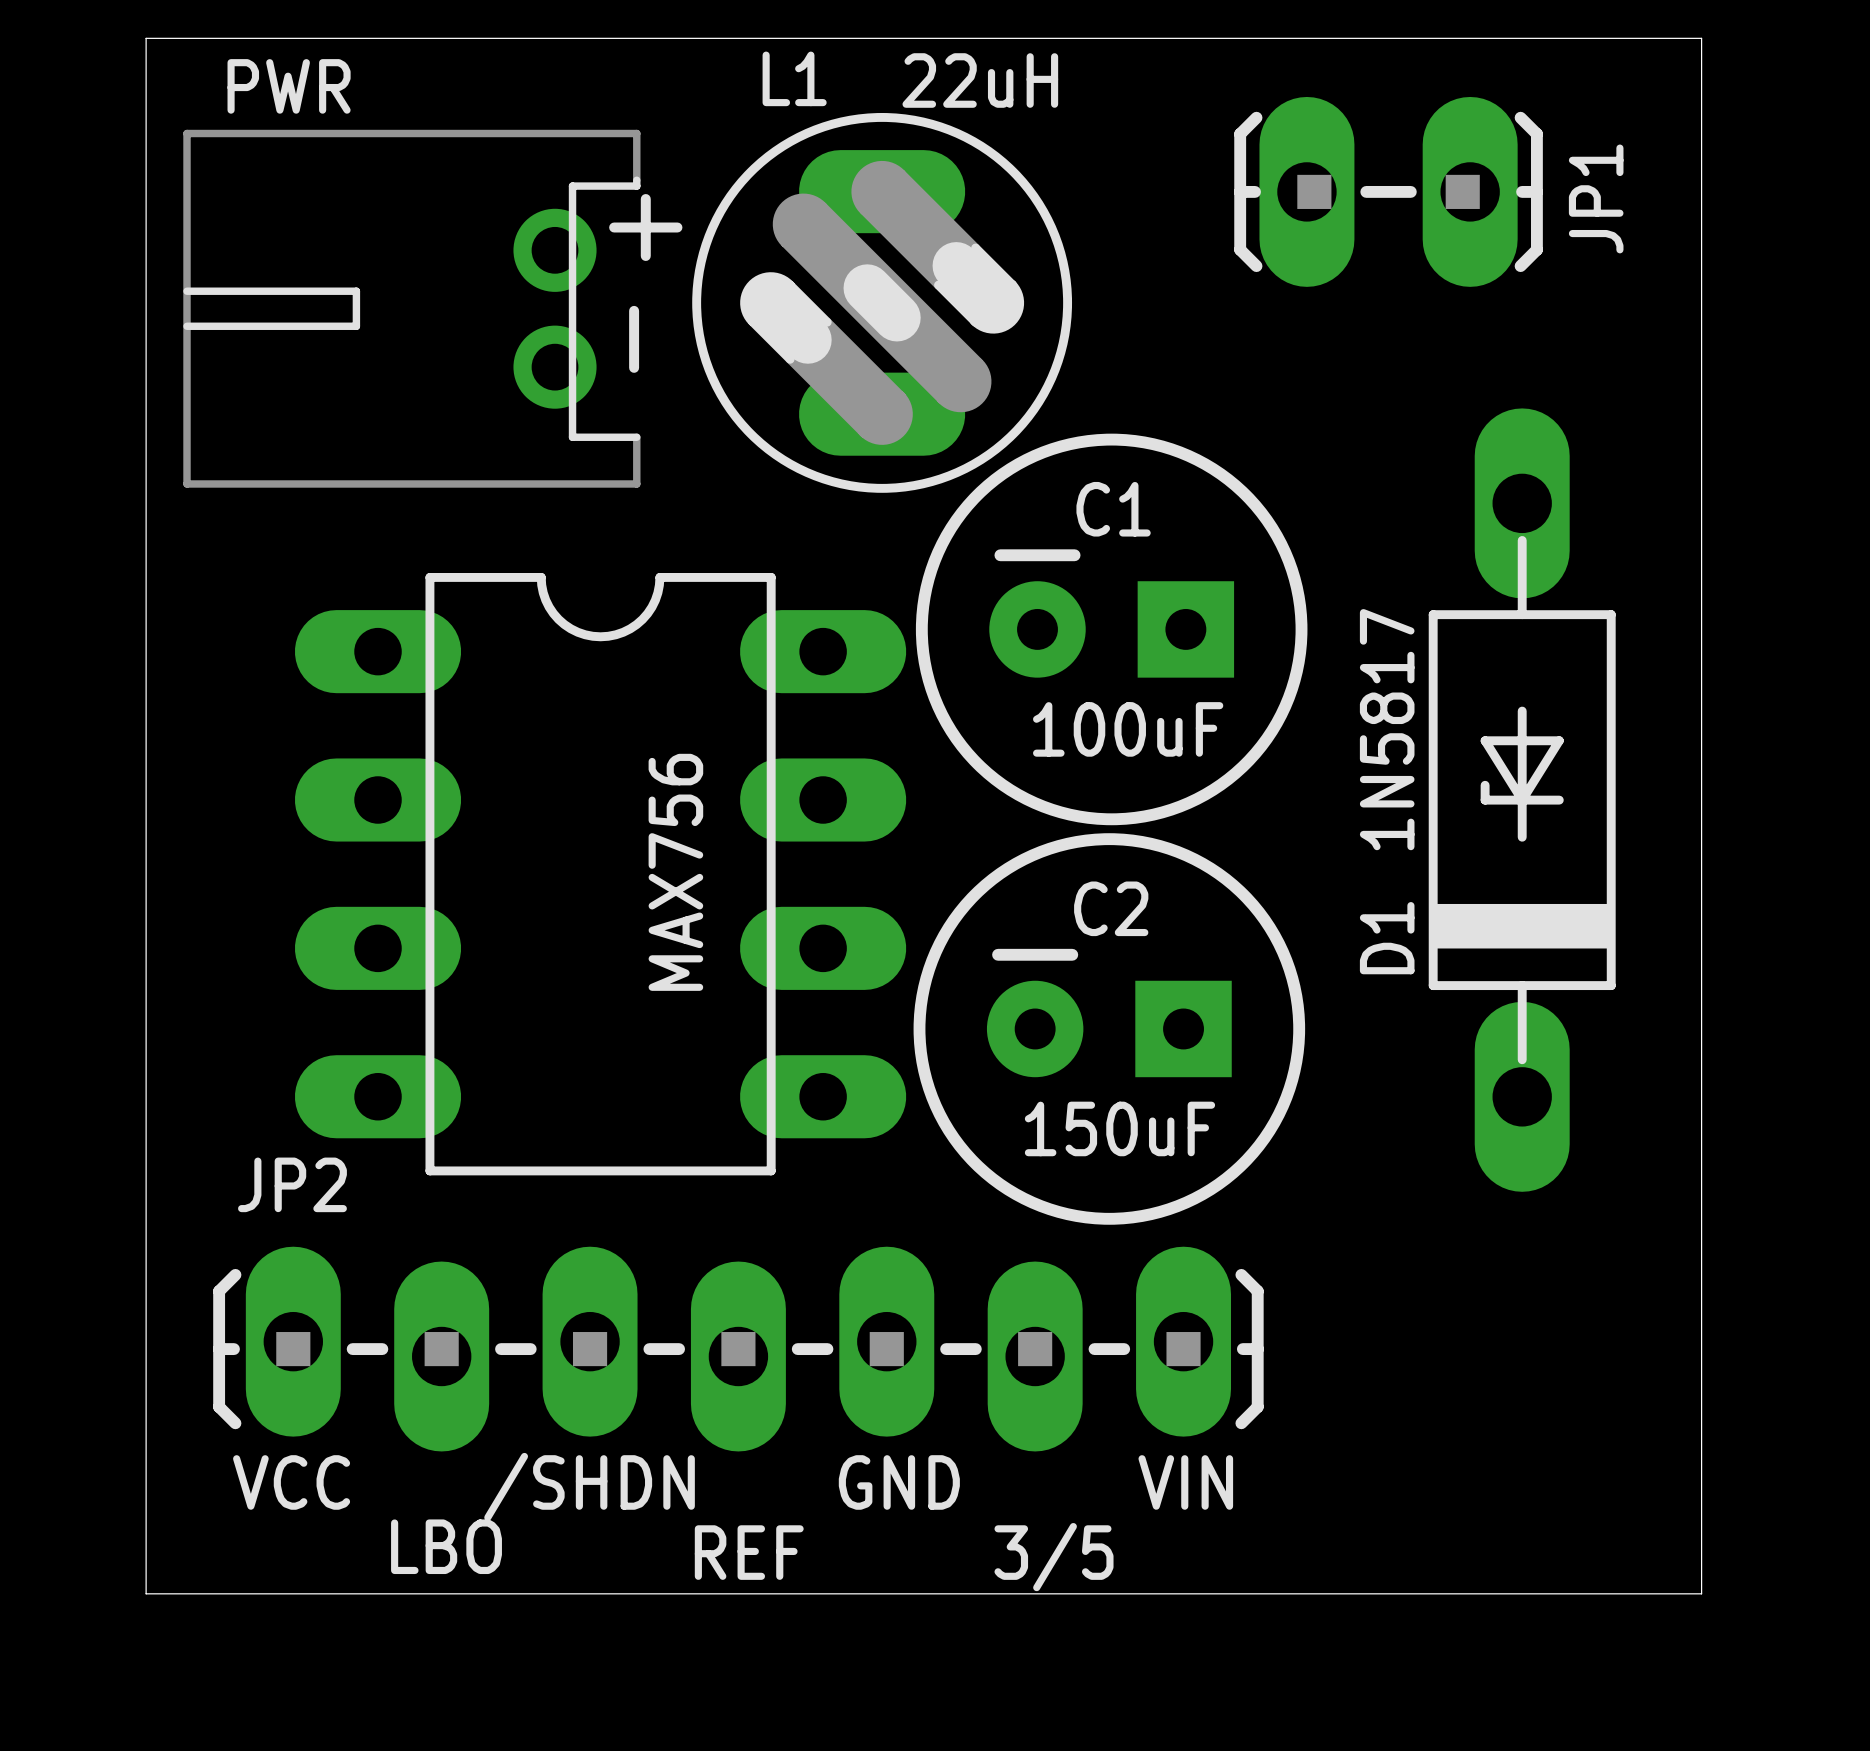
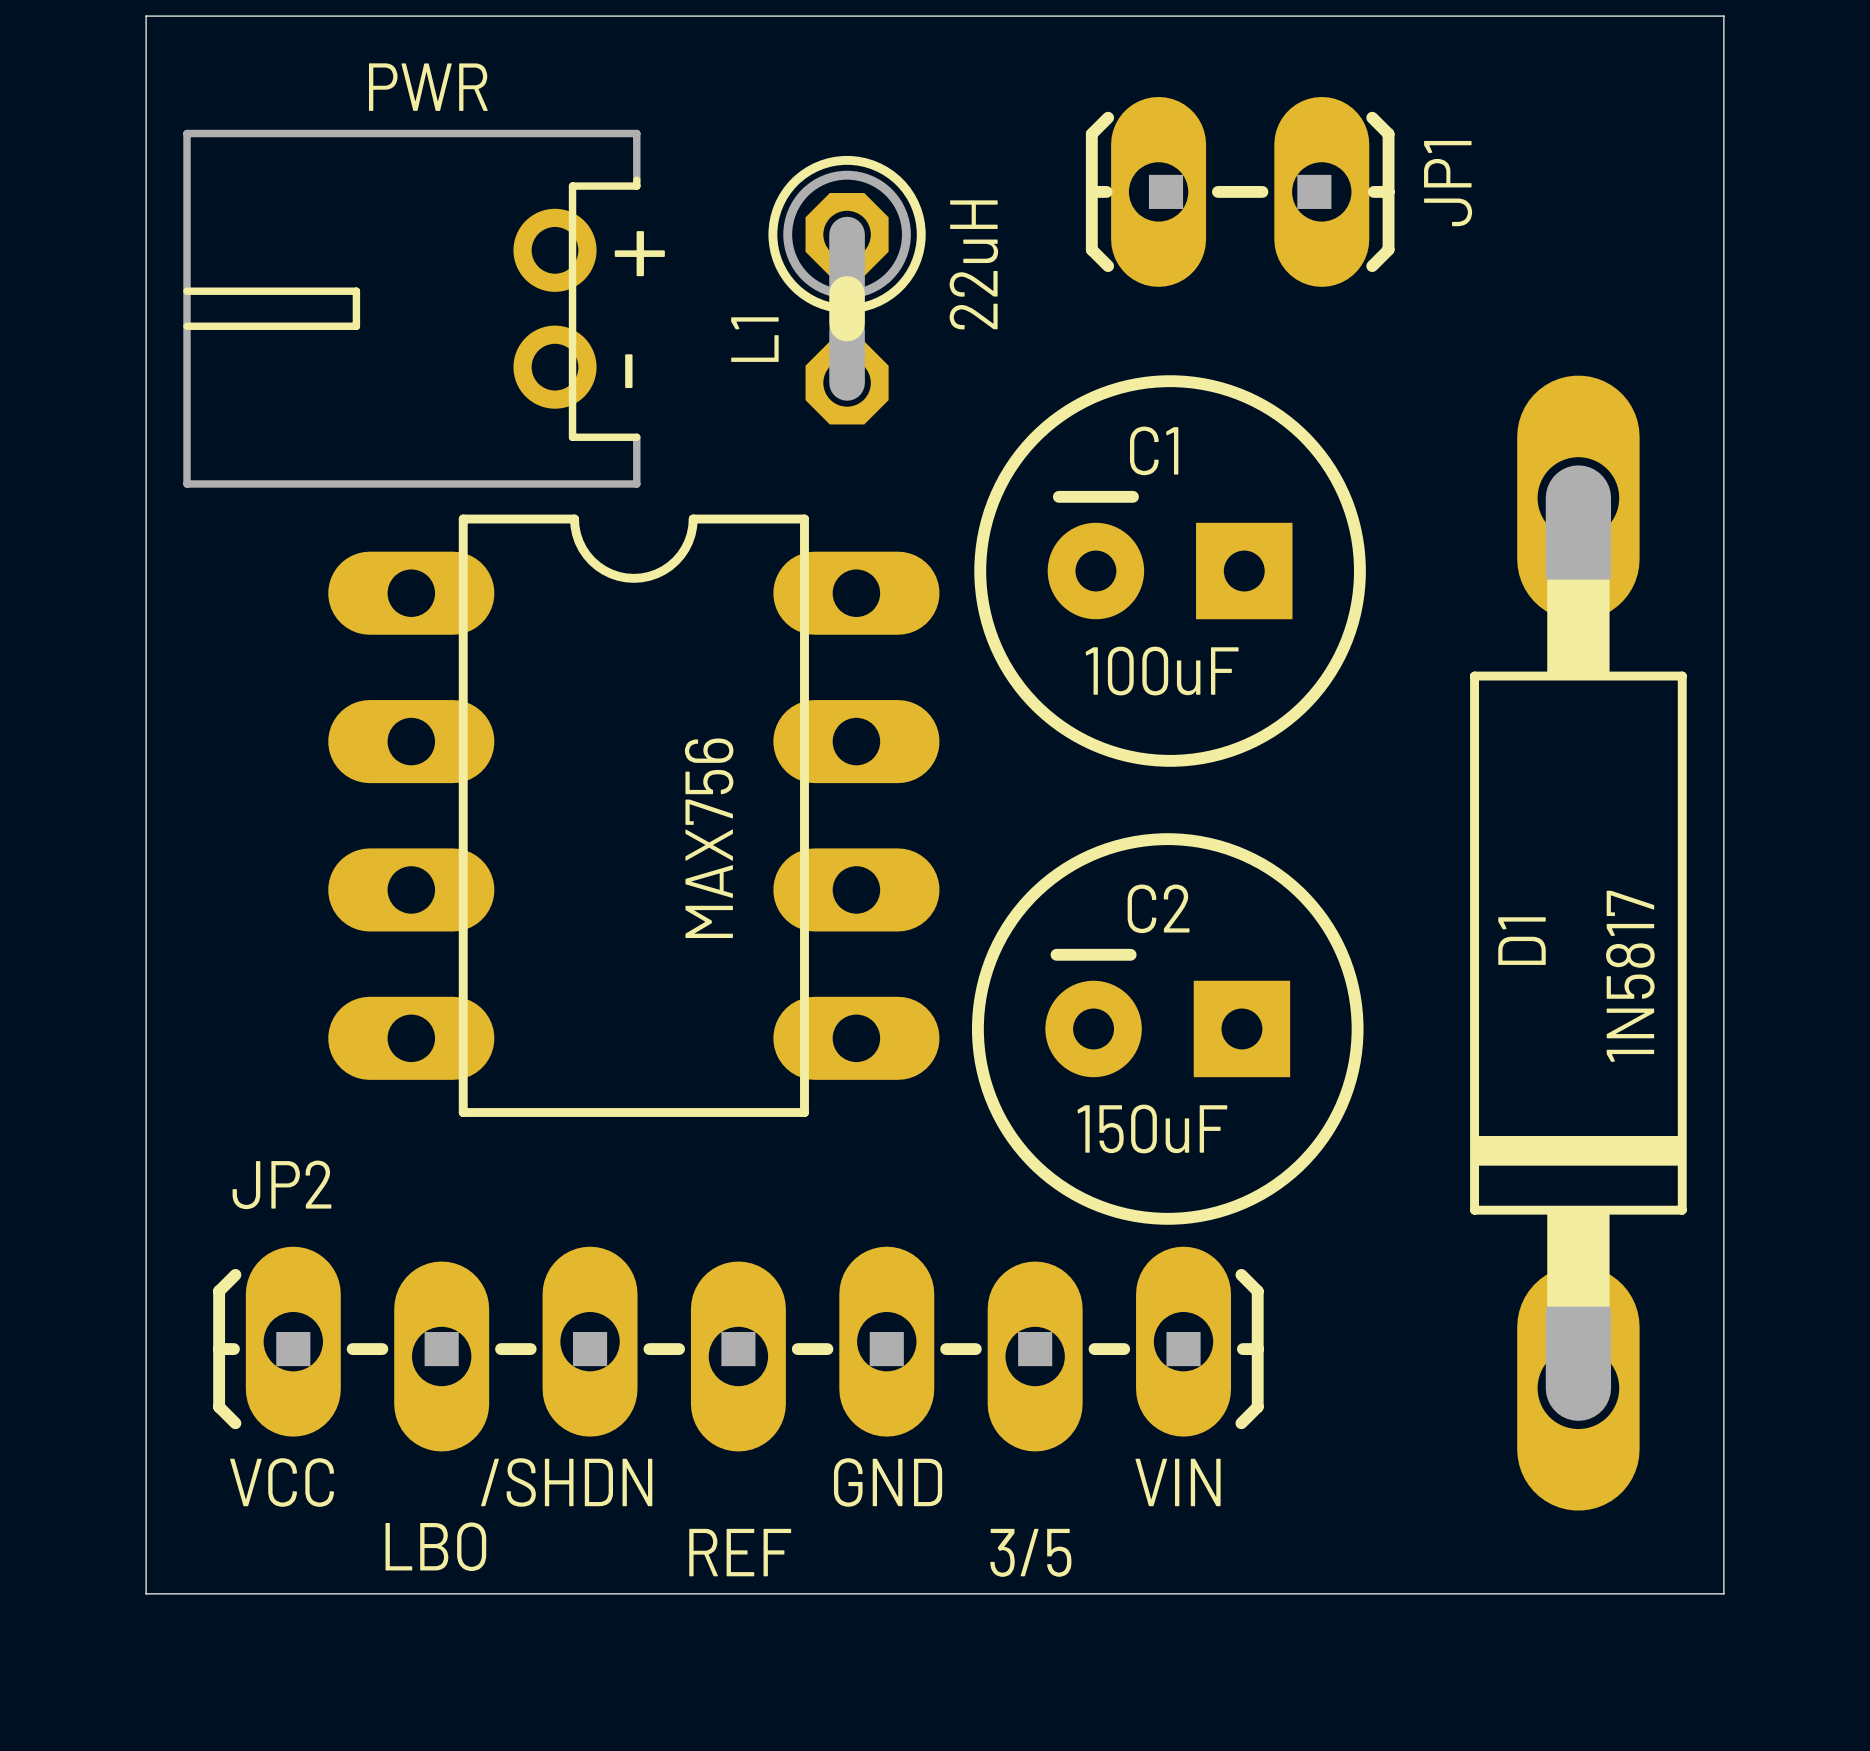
board edge: (146, 38) (1701, 38) (1701, 1593) -> (146, 38) (146, 16) (1723, 16) (1723, 1593) (1701, 1593)
L1 name position: L1 (794, 78) -> L1 (754, 339)
L1 value position: 22uH (980, 80) -> 22uH (973, 264)
PWR name position: PWR (289, 86) -> PWR (428, 87)
L1 footprint: [692, 112, 1073, 493] -> [768, 155, 926, 425]
JP1 position: (1388, 191) -> (1240, 191)
D1 footprint: [1428, 408, 1616, 1192] -> [1470, 375, 1687, 1511]
C1 position: (1111, 629) -> (1170, 571)
D1 value position: 1N5817 (1387, 729) -> 1N5817 (1630, 976)
MAX756 position: (600, 874) -> (633, 815)
D1 name position: D1 (1387, 938) -> D1 (1522, 941)
C2 position: (1109, 1028) -> (1167, 1028)

